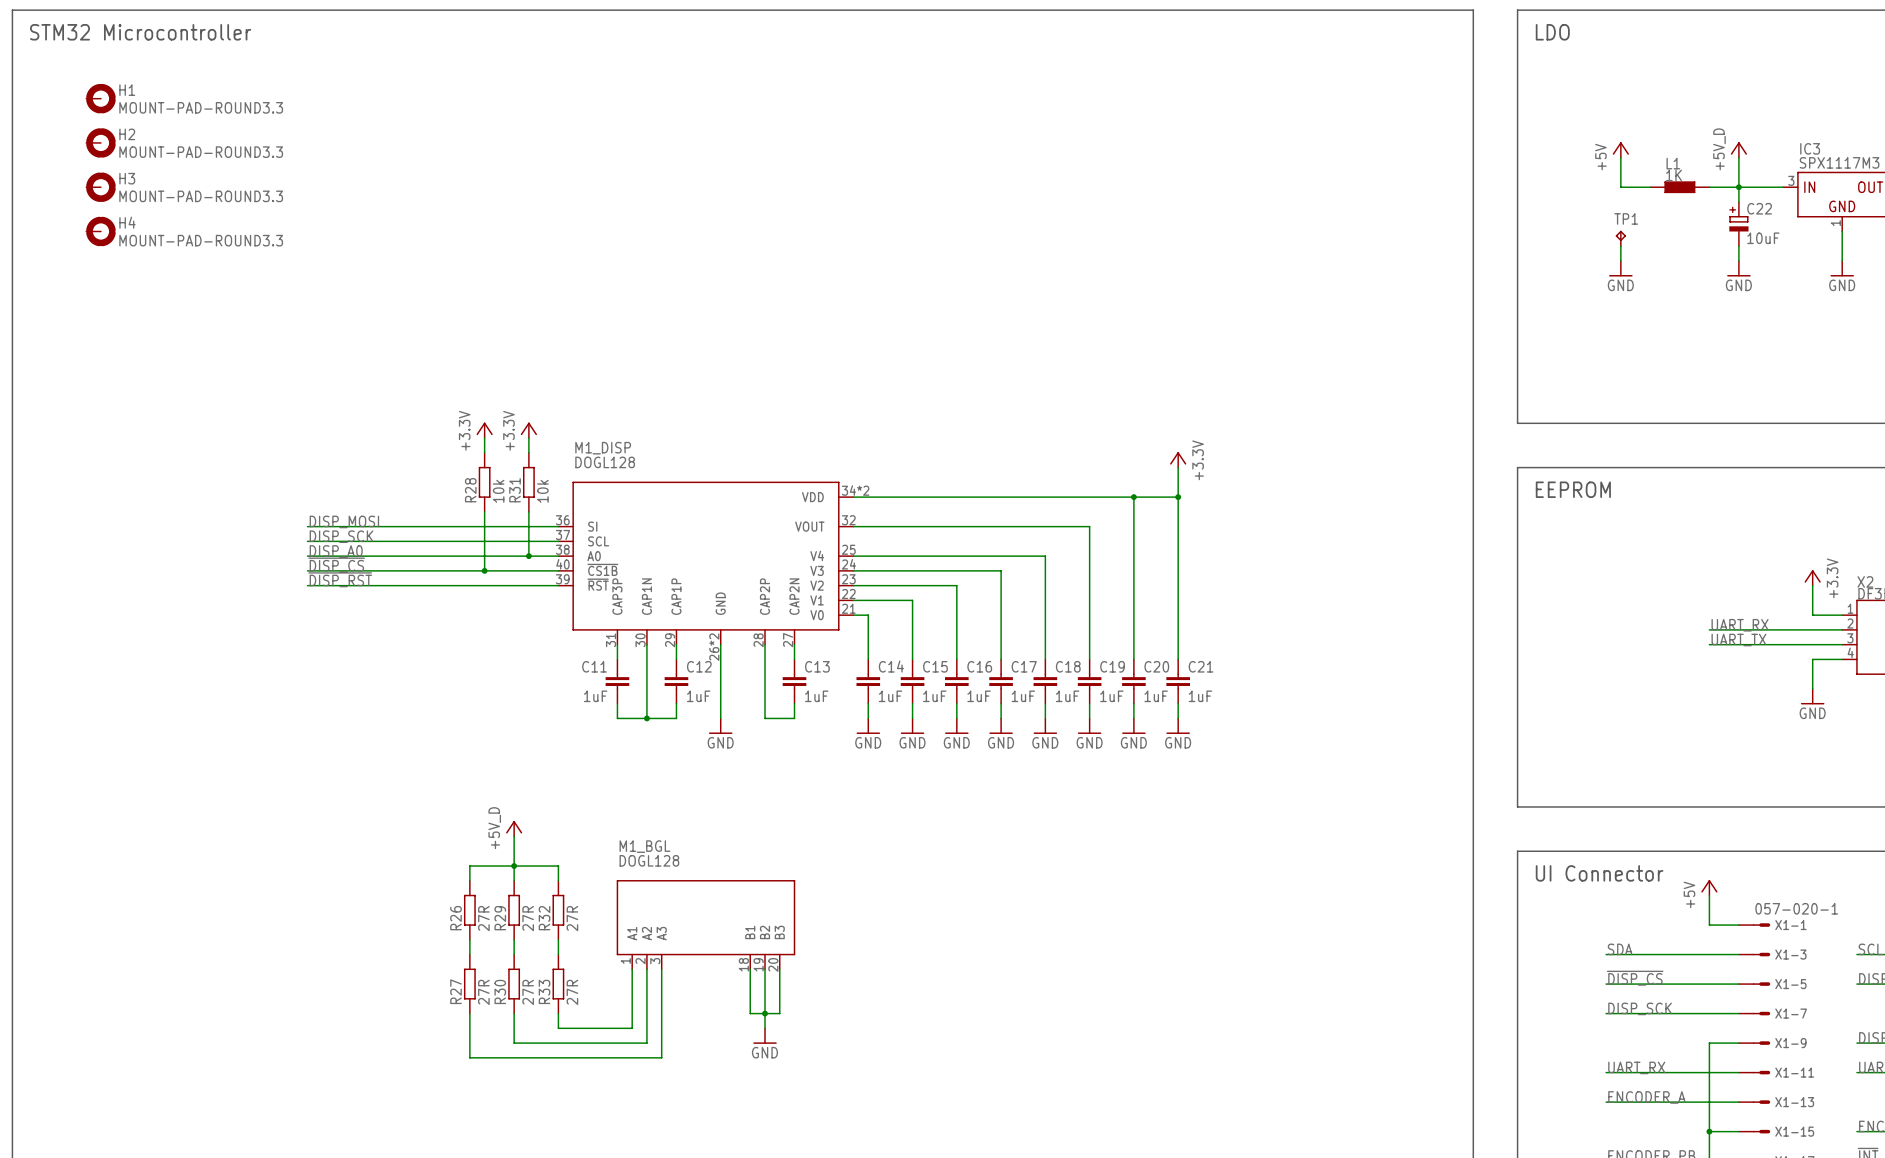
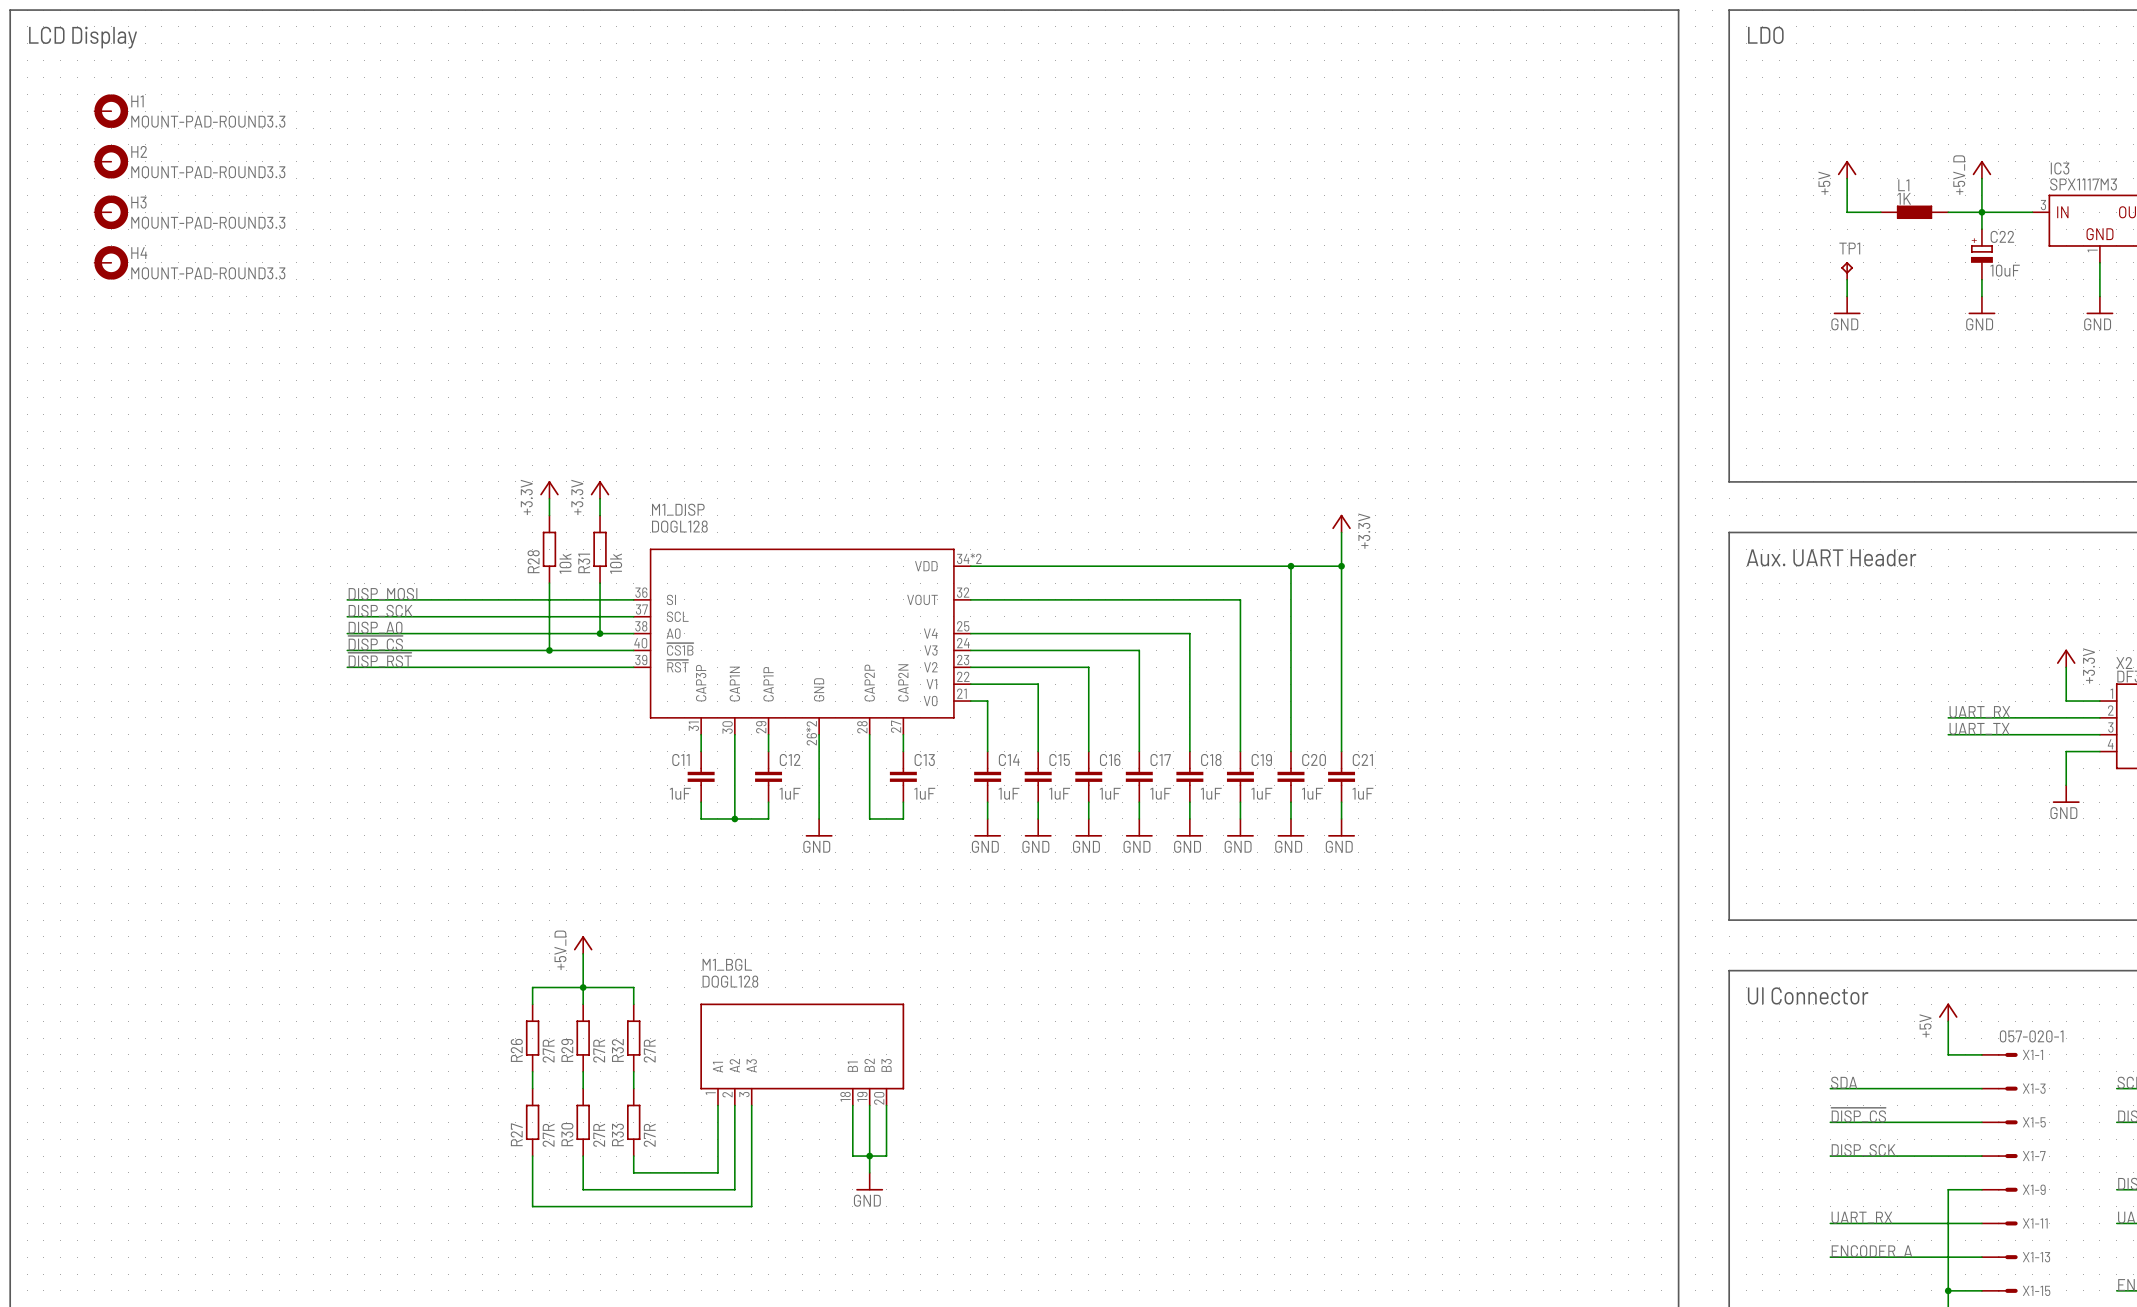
text: STM32 Microcontroller (140, 32) -> LCD Display (83, 37)
text: EEPROM (1573, 489) -> Aux. UART Header (1831, 557)

